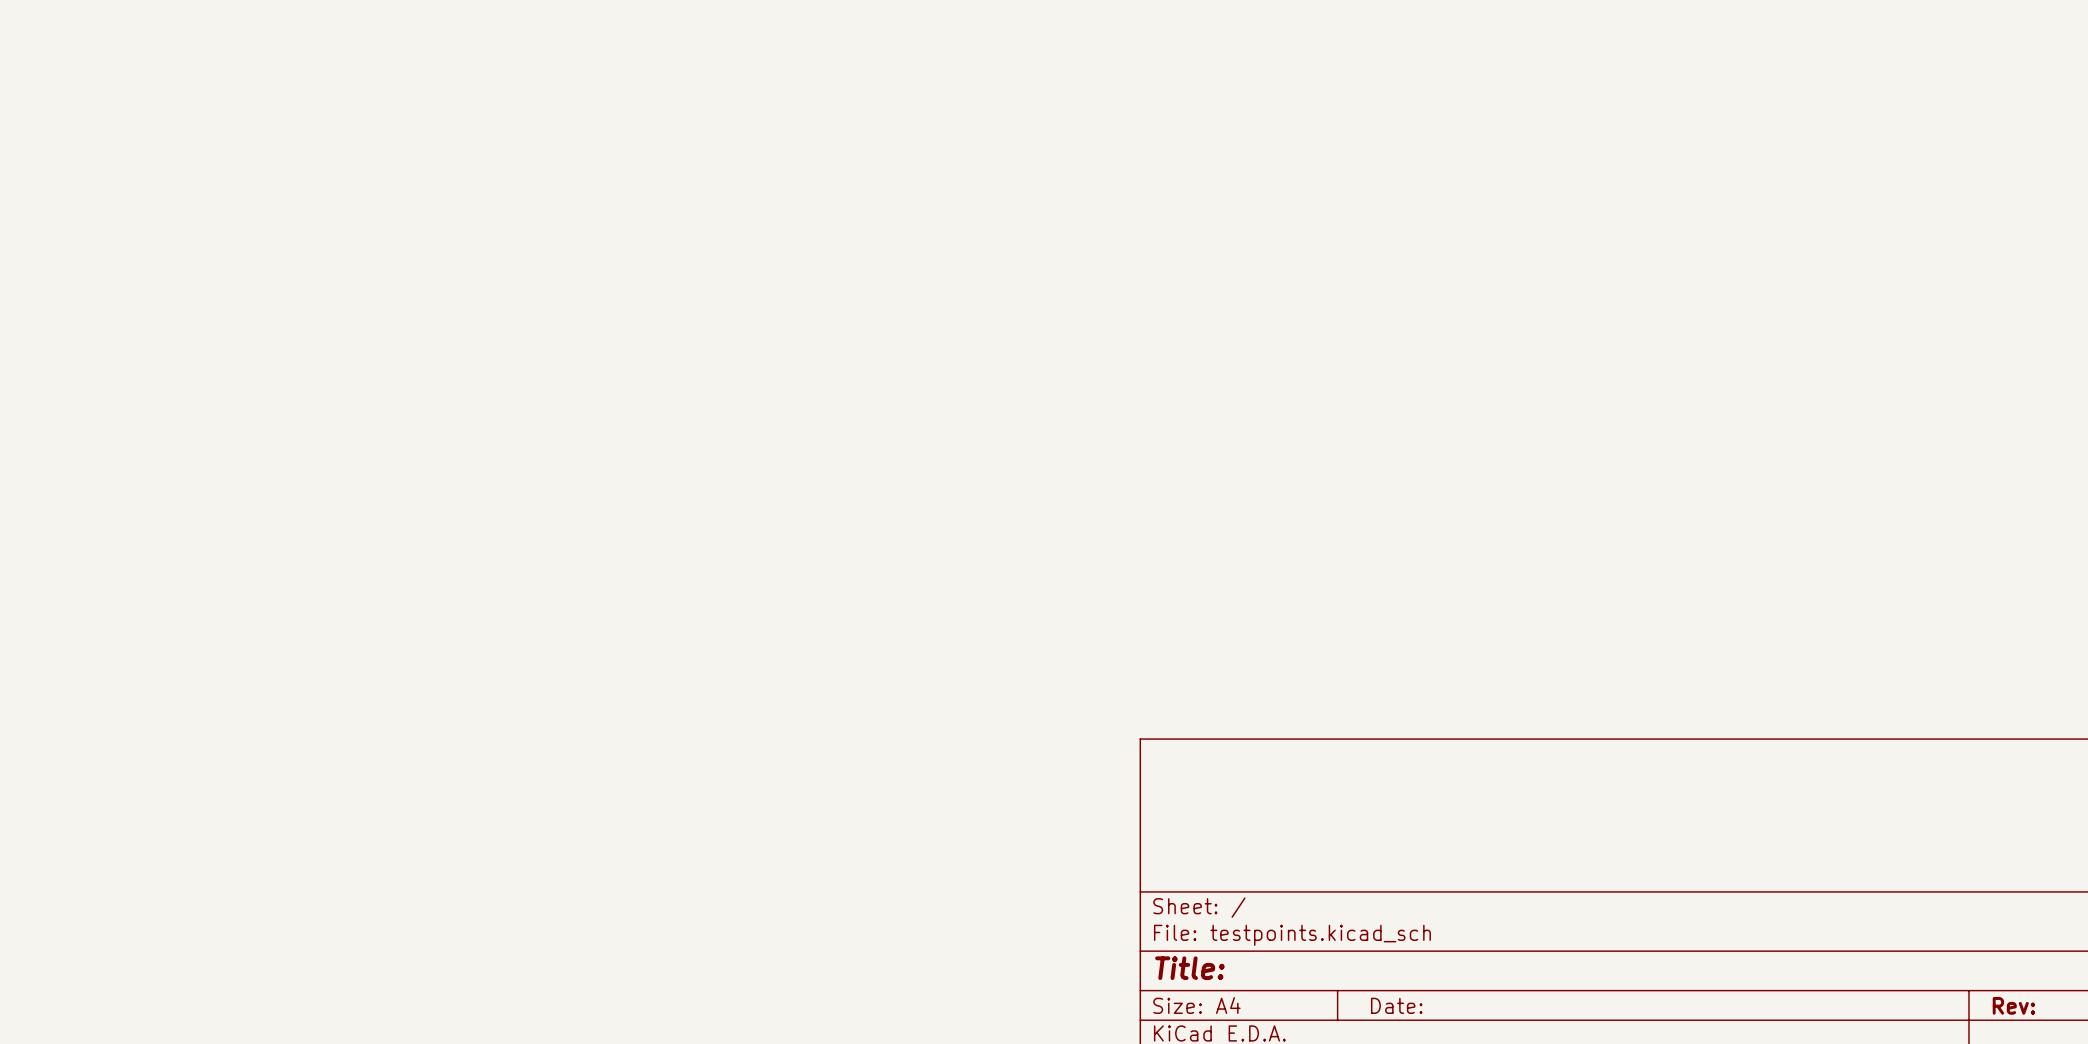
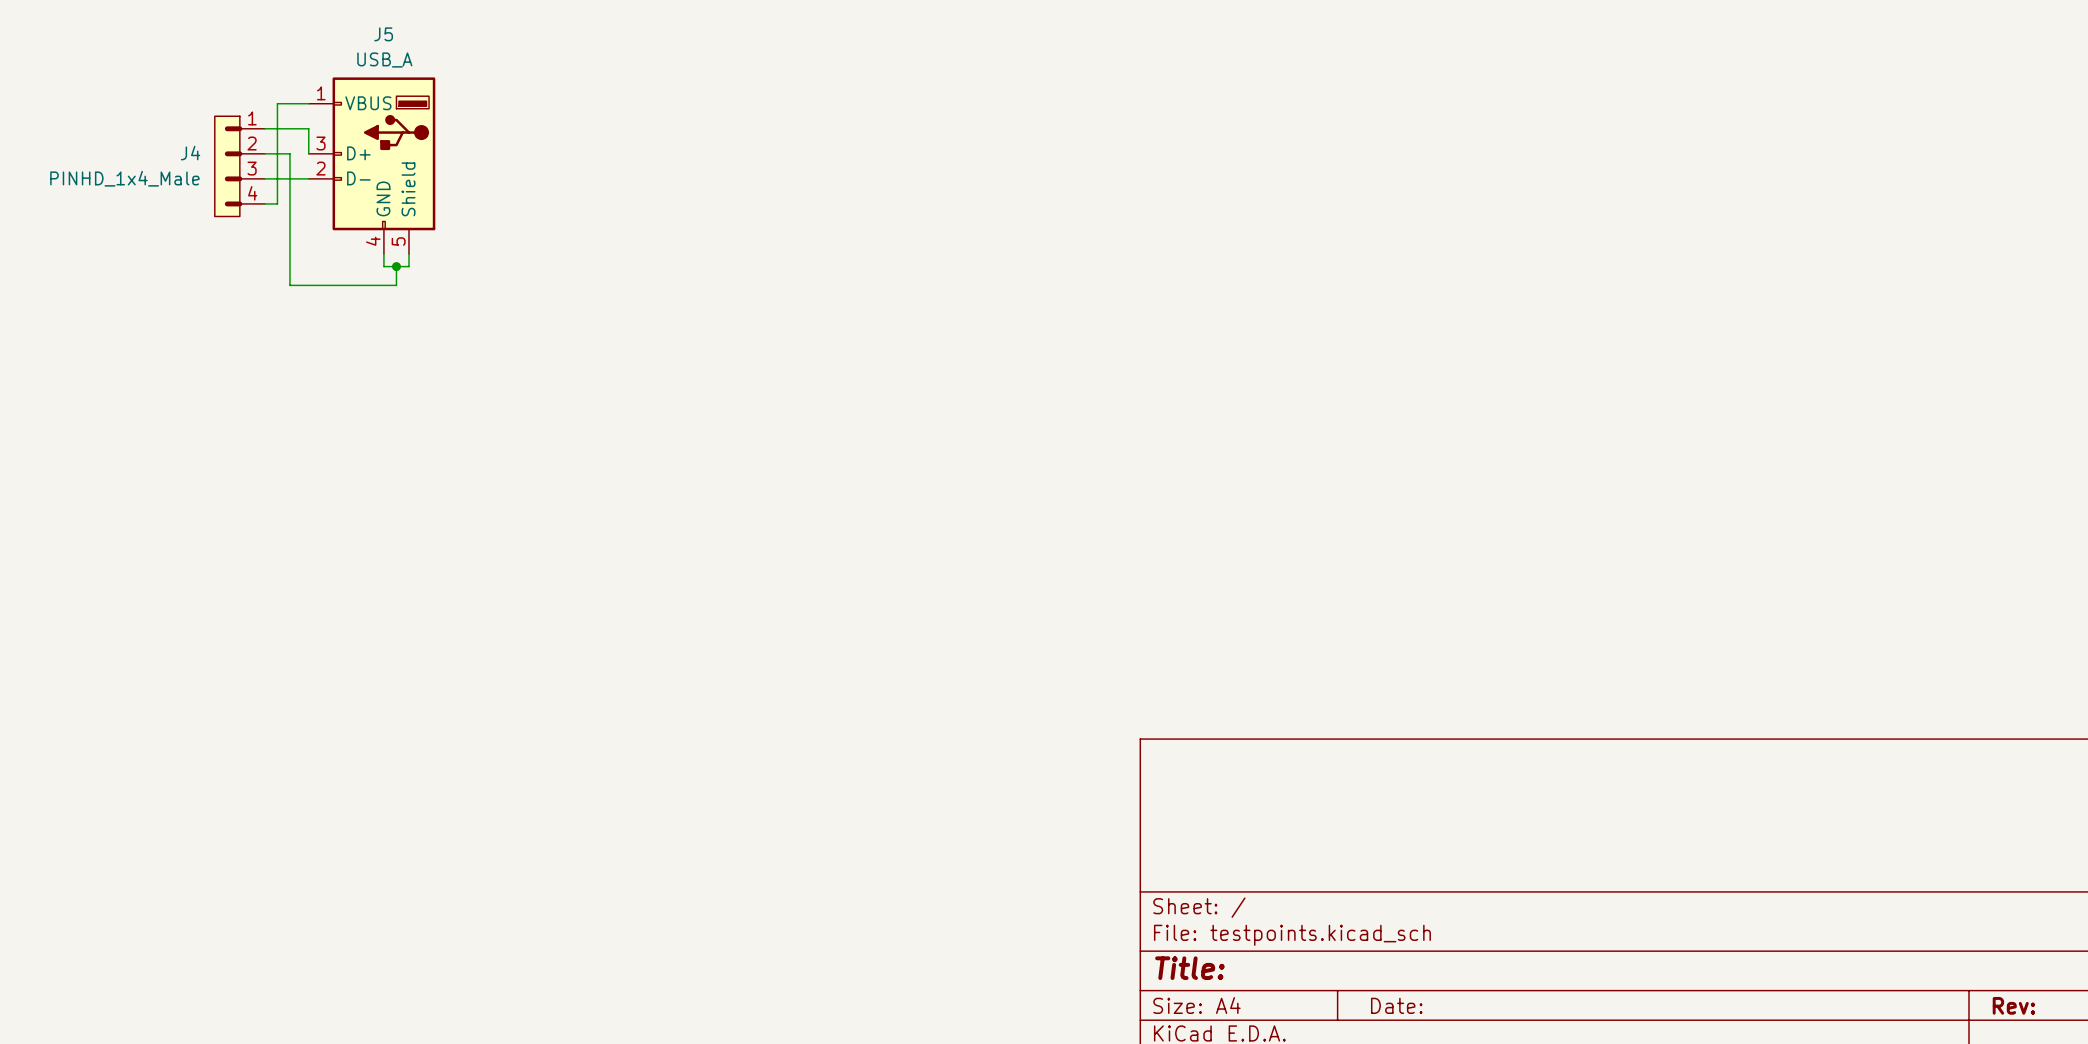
wire: none -> (308, 103) (277, 103) (277, 203) (264, 203)
wire: none -> (264, 128) (308, 128) (308, 153)
wire: none -> (264, 153) (289, 153) (289, 285) (396, 285) (396, 266)
J5: none -> USB_A (372, 165)
J4: none -> PINHD_1x4_Male (239, 166)
wire: none -> (264, 178) (308, 178)
wire: none -> (383, 254) (383, 266) (408, 266) (408, 254)
junction: none -> (396, 266)

